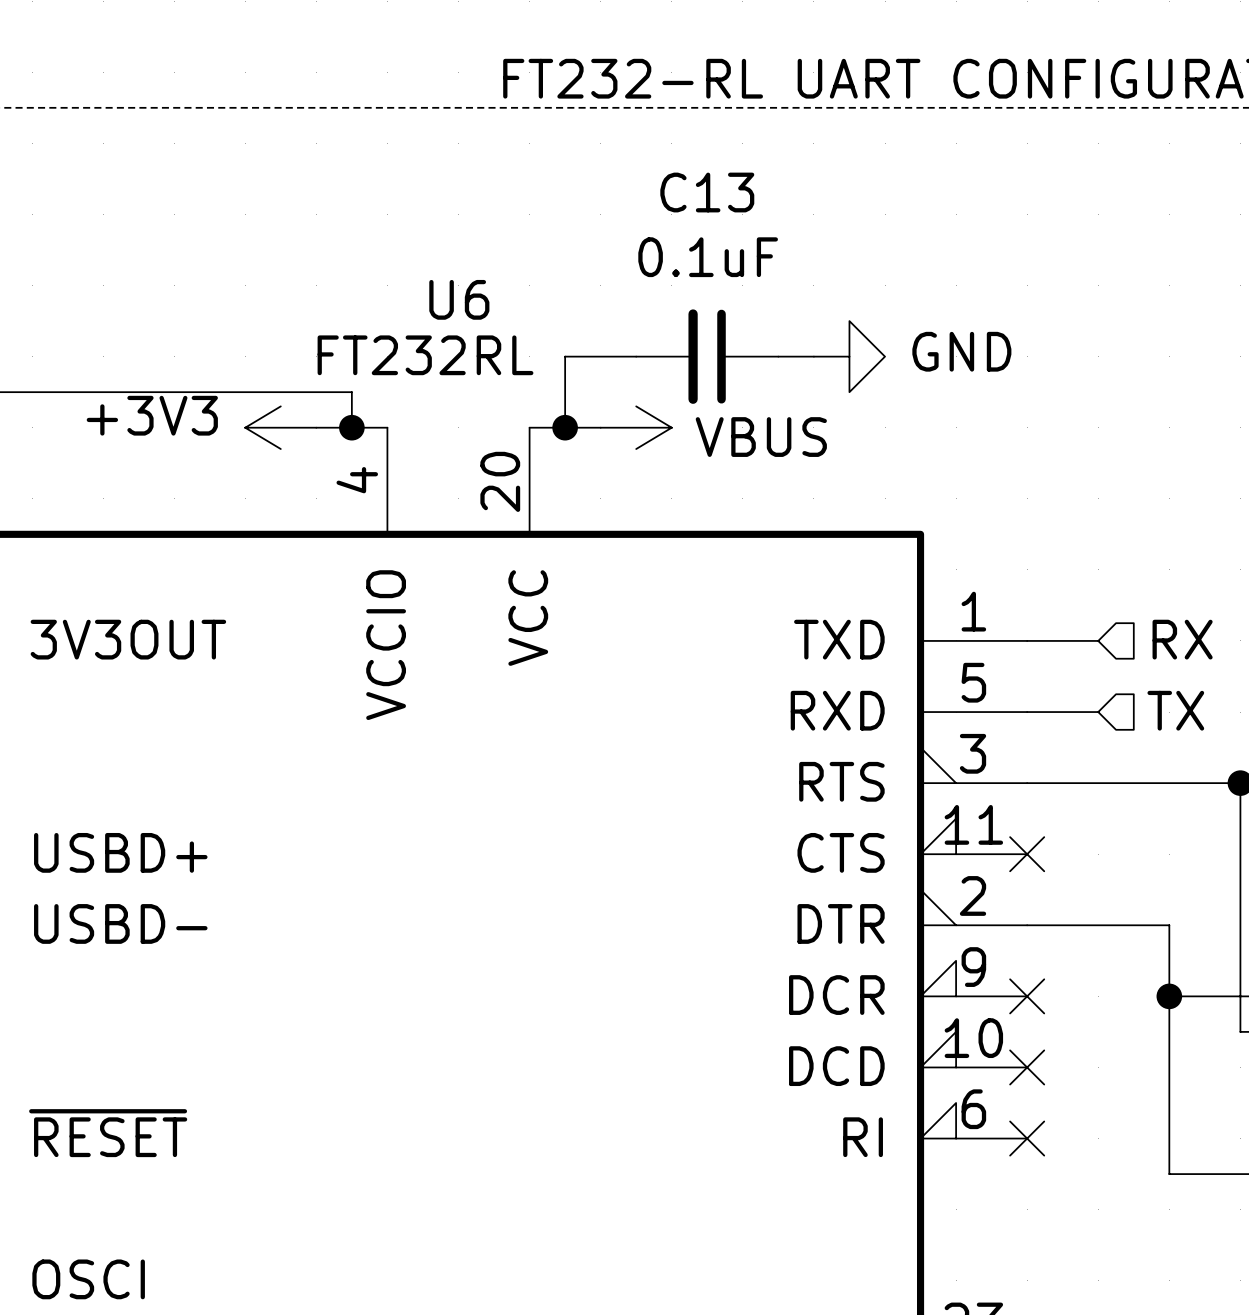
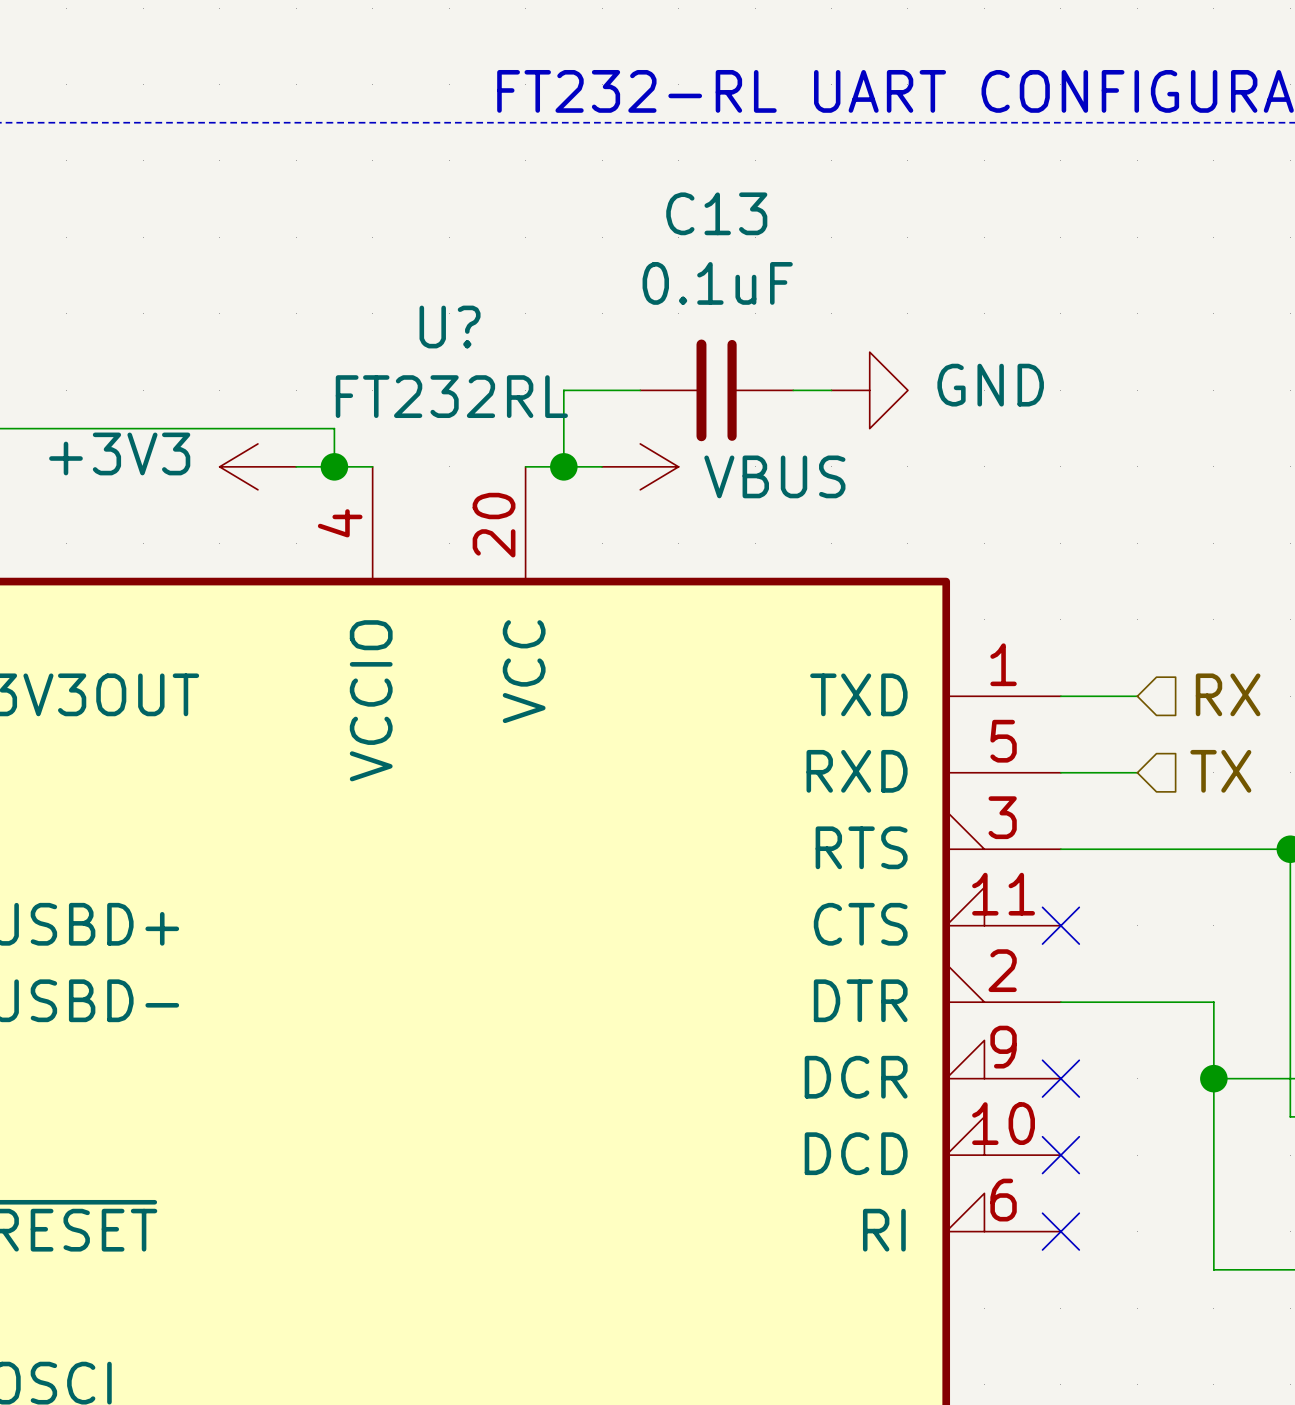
U6 name: U6 (459, 299) -> U? (450, 327)
U6 value position: FT232RL (425, 355) -> FT232RL (451, 396)

